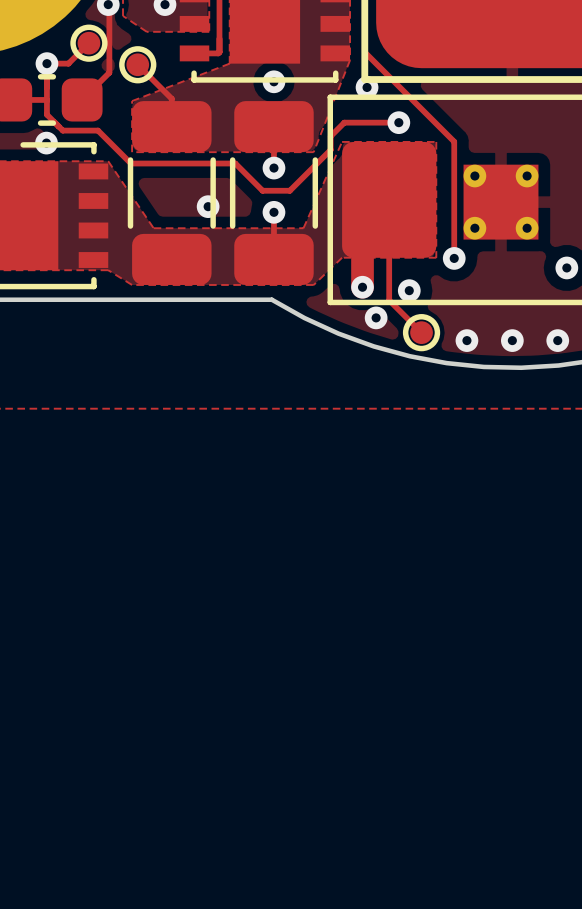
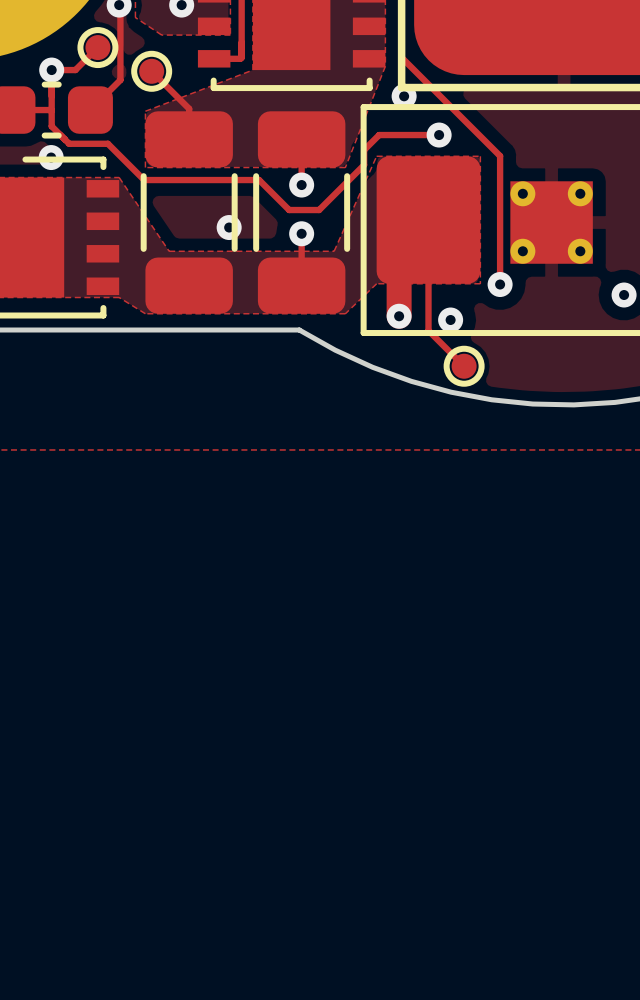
via: (273, 81) -> none
via: (376, 317) -> none
via: (466, 340) -> none
via: (512, 340) -> none
via: (557, 340) -> none

